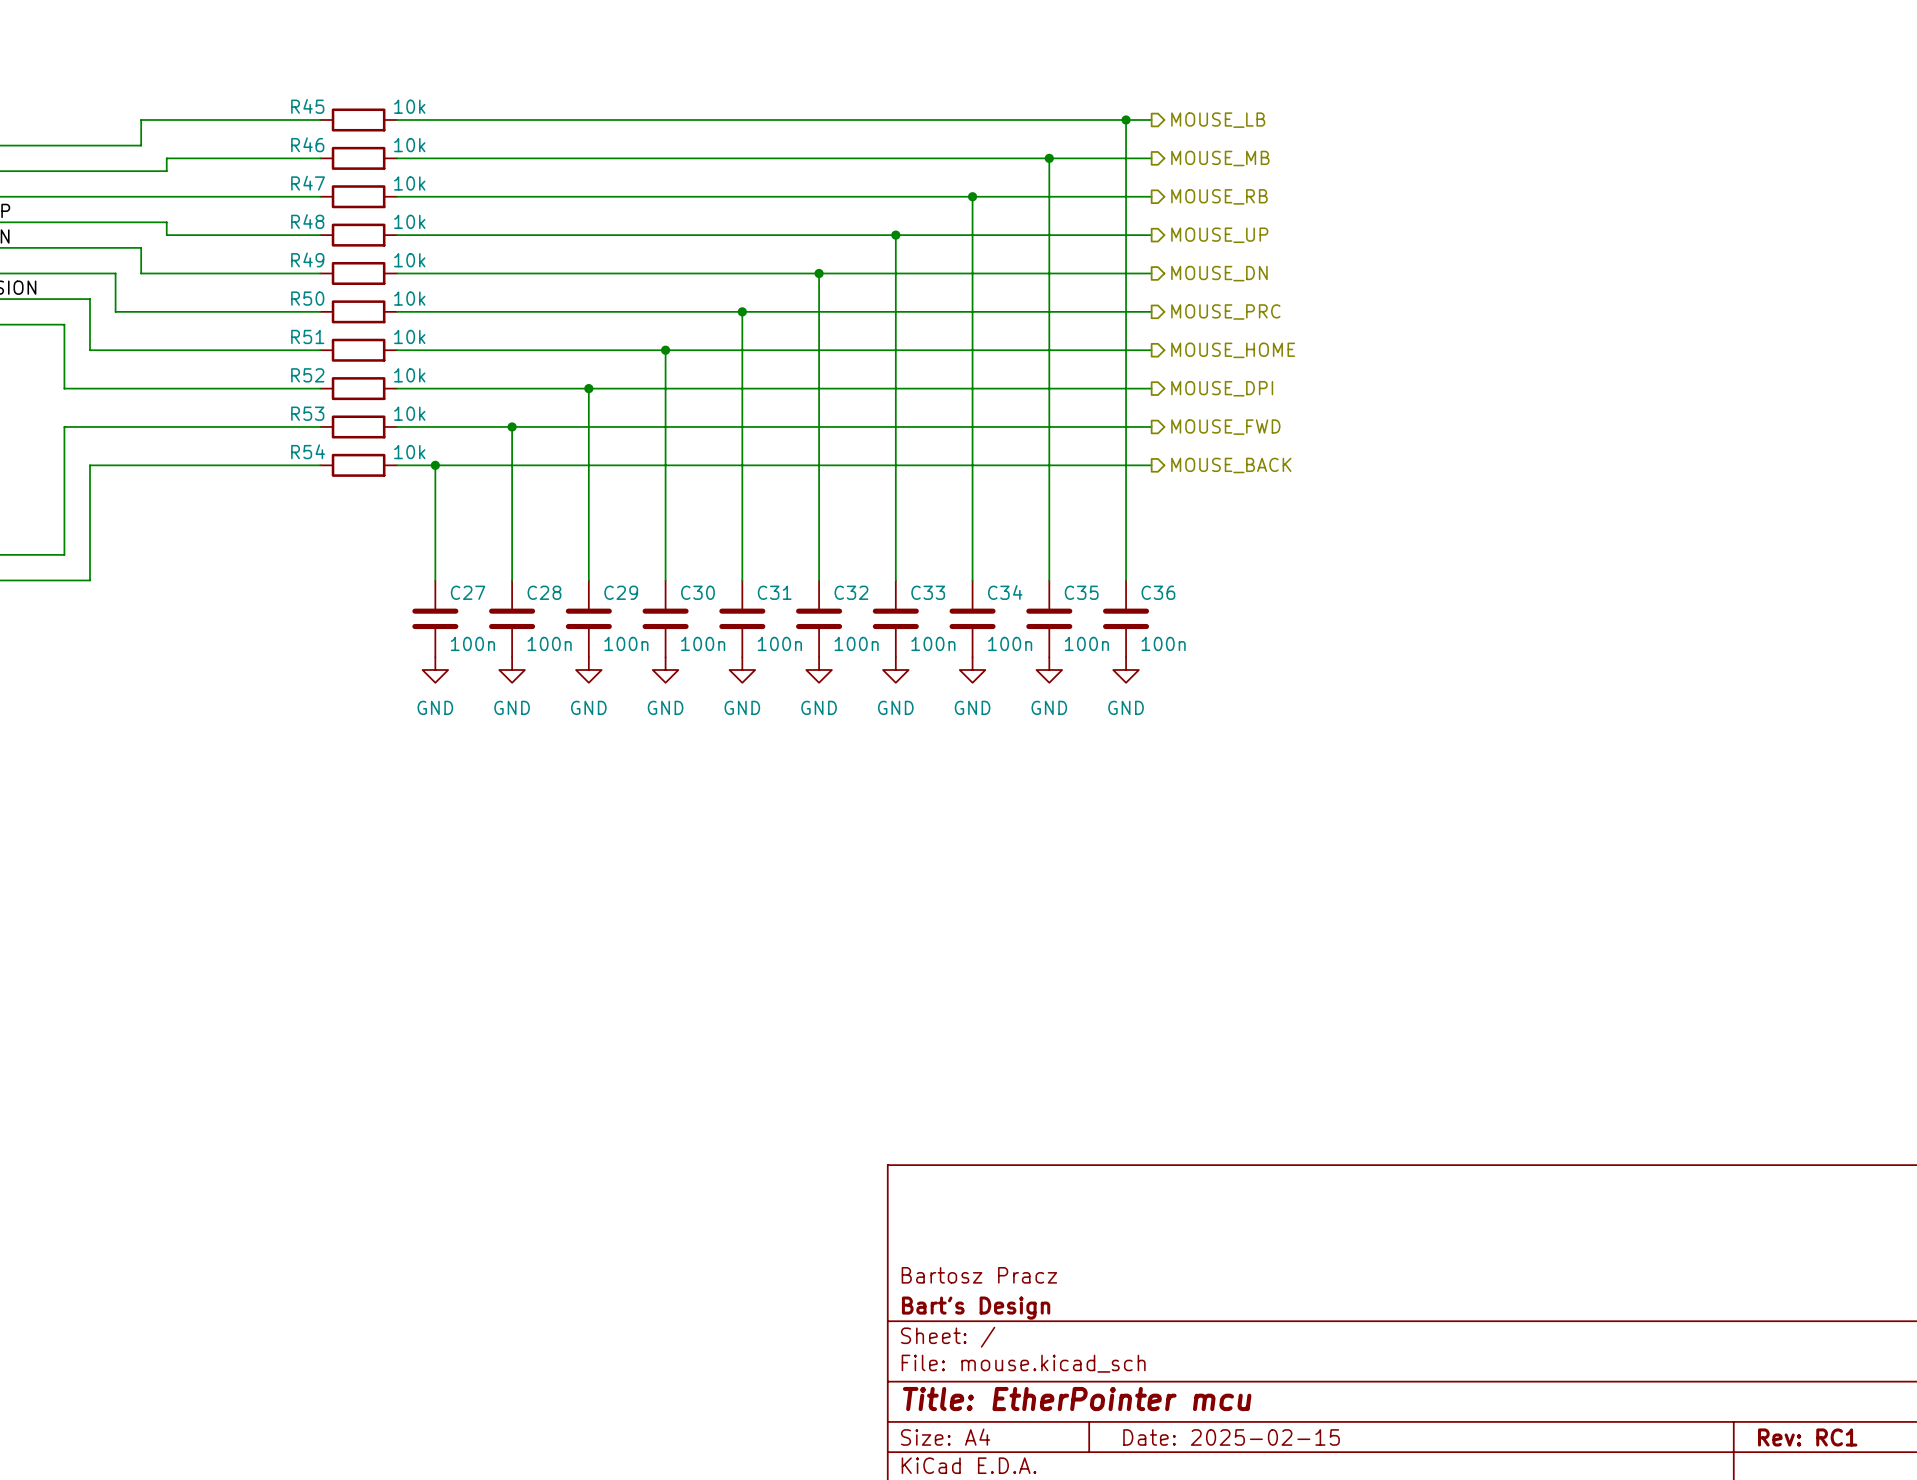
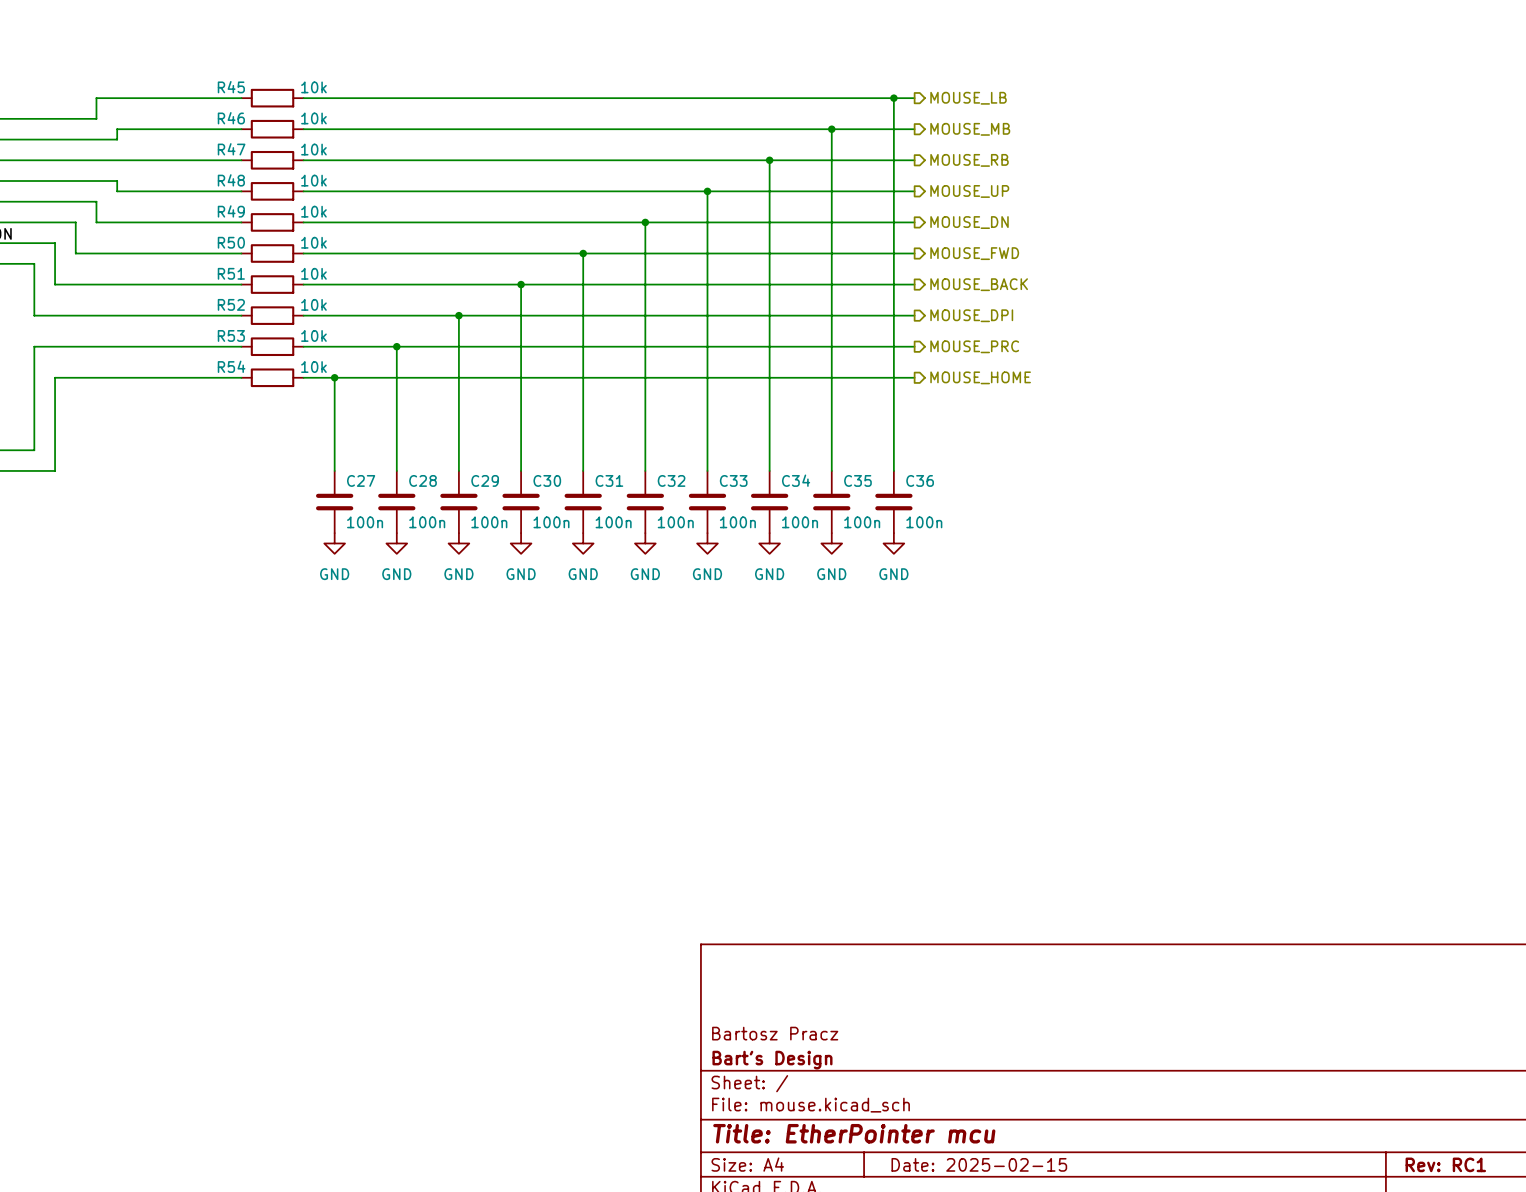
hierarchical label: MOUSE_PRC (1225, 311) -> MOUSE_FWD (974, 253)
hierarchical label: MOUSE_HOME (1233, 350) -> MOUSE_BACK (979, 284)
hierarchical label: MOUSE_FWD (1225, 427) -> MOUSE_PRC (974, 346)
hierarchical label: MOUSE_BACK (1231, 465) -> MOUSE_HOME (980, 377)

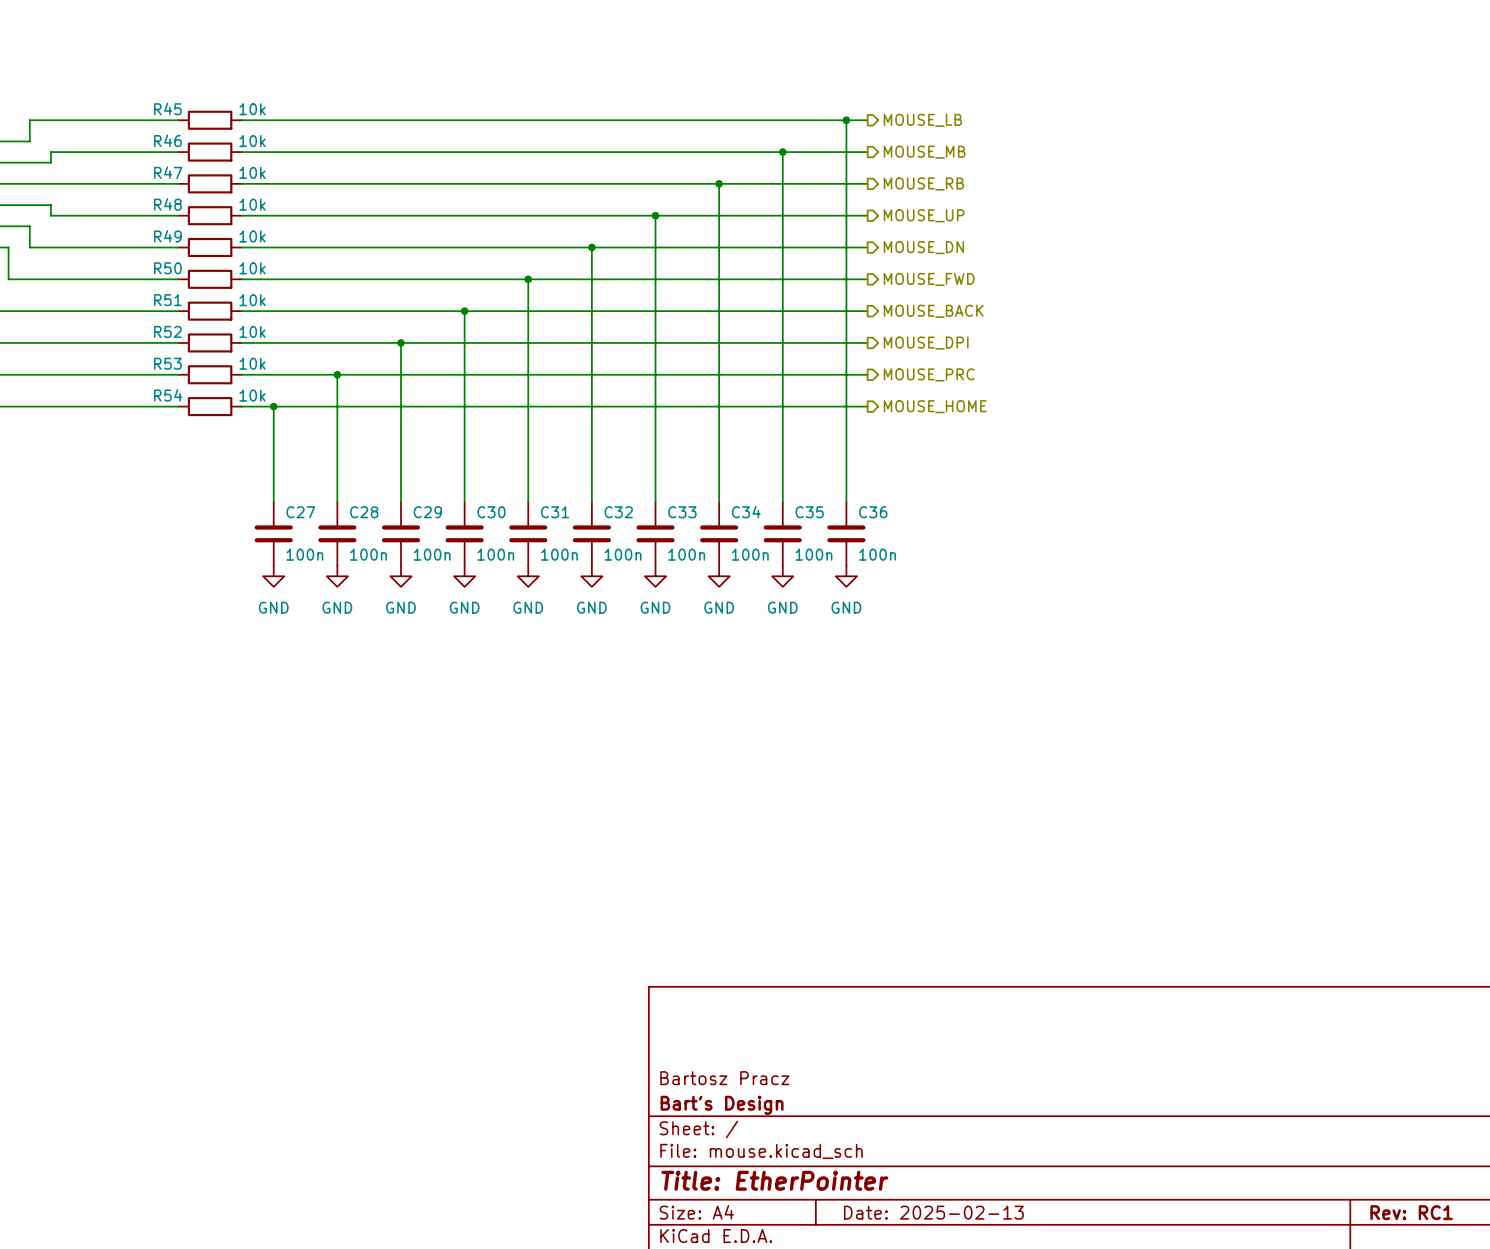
title block: Title: EtherPointer mcu (854, 1133) -> Title: EtherPointer (774, 1180)
title block: Date: 2025-02-15 (979, 1164) -> Date: 2025-02-13 (933, 1212)

